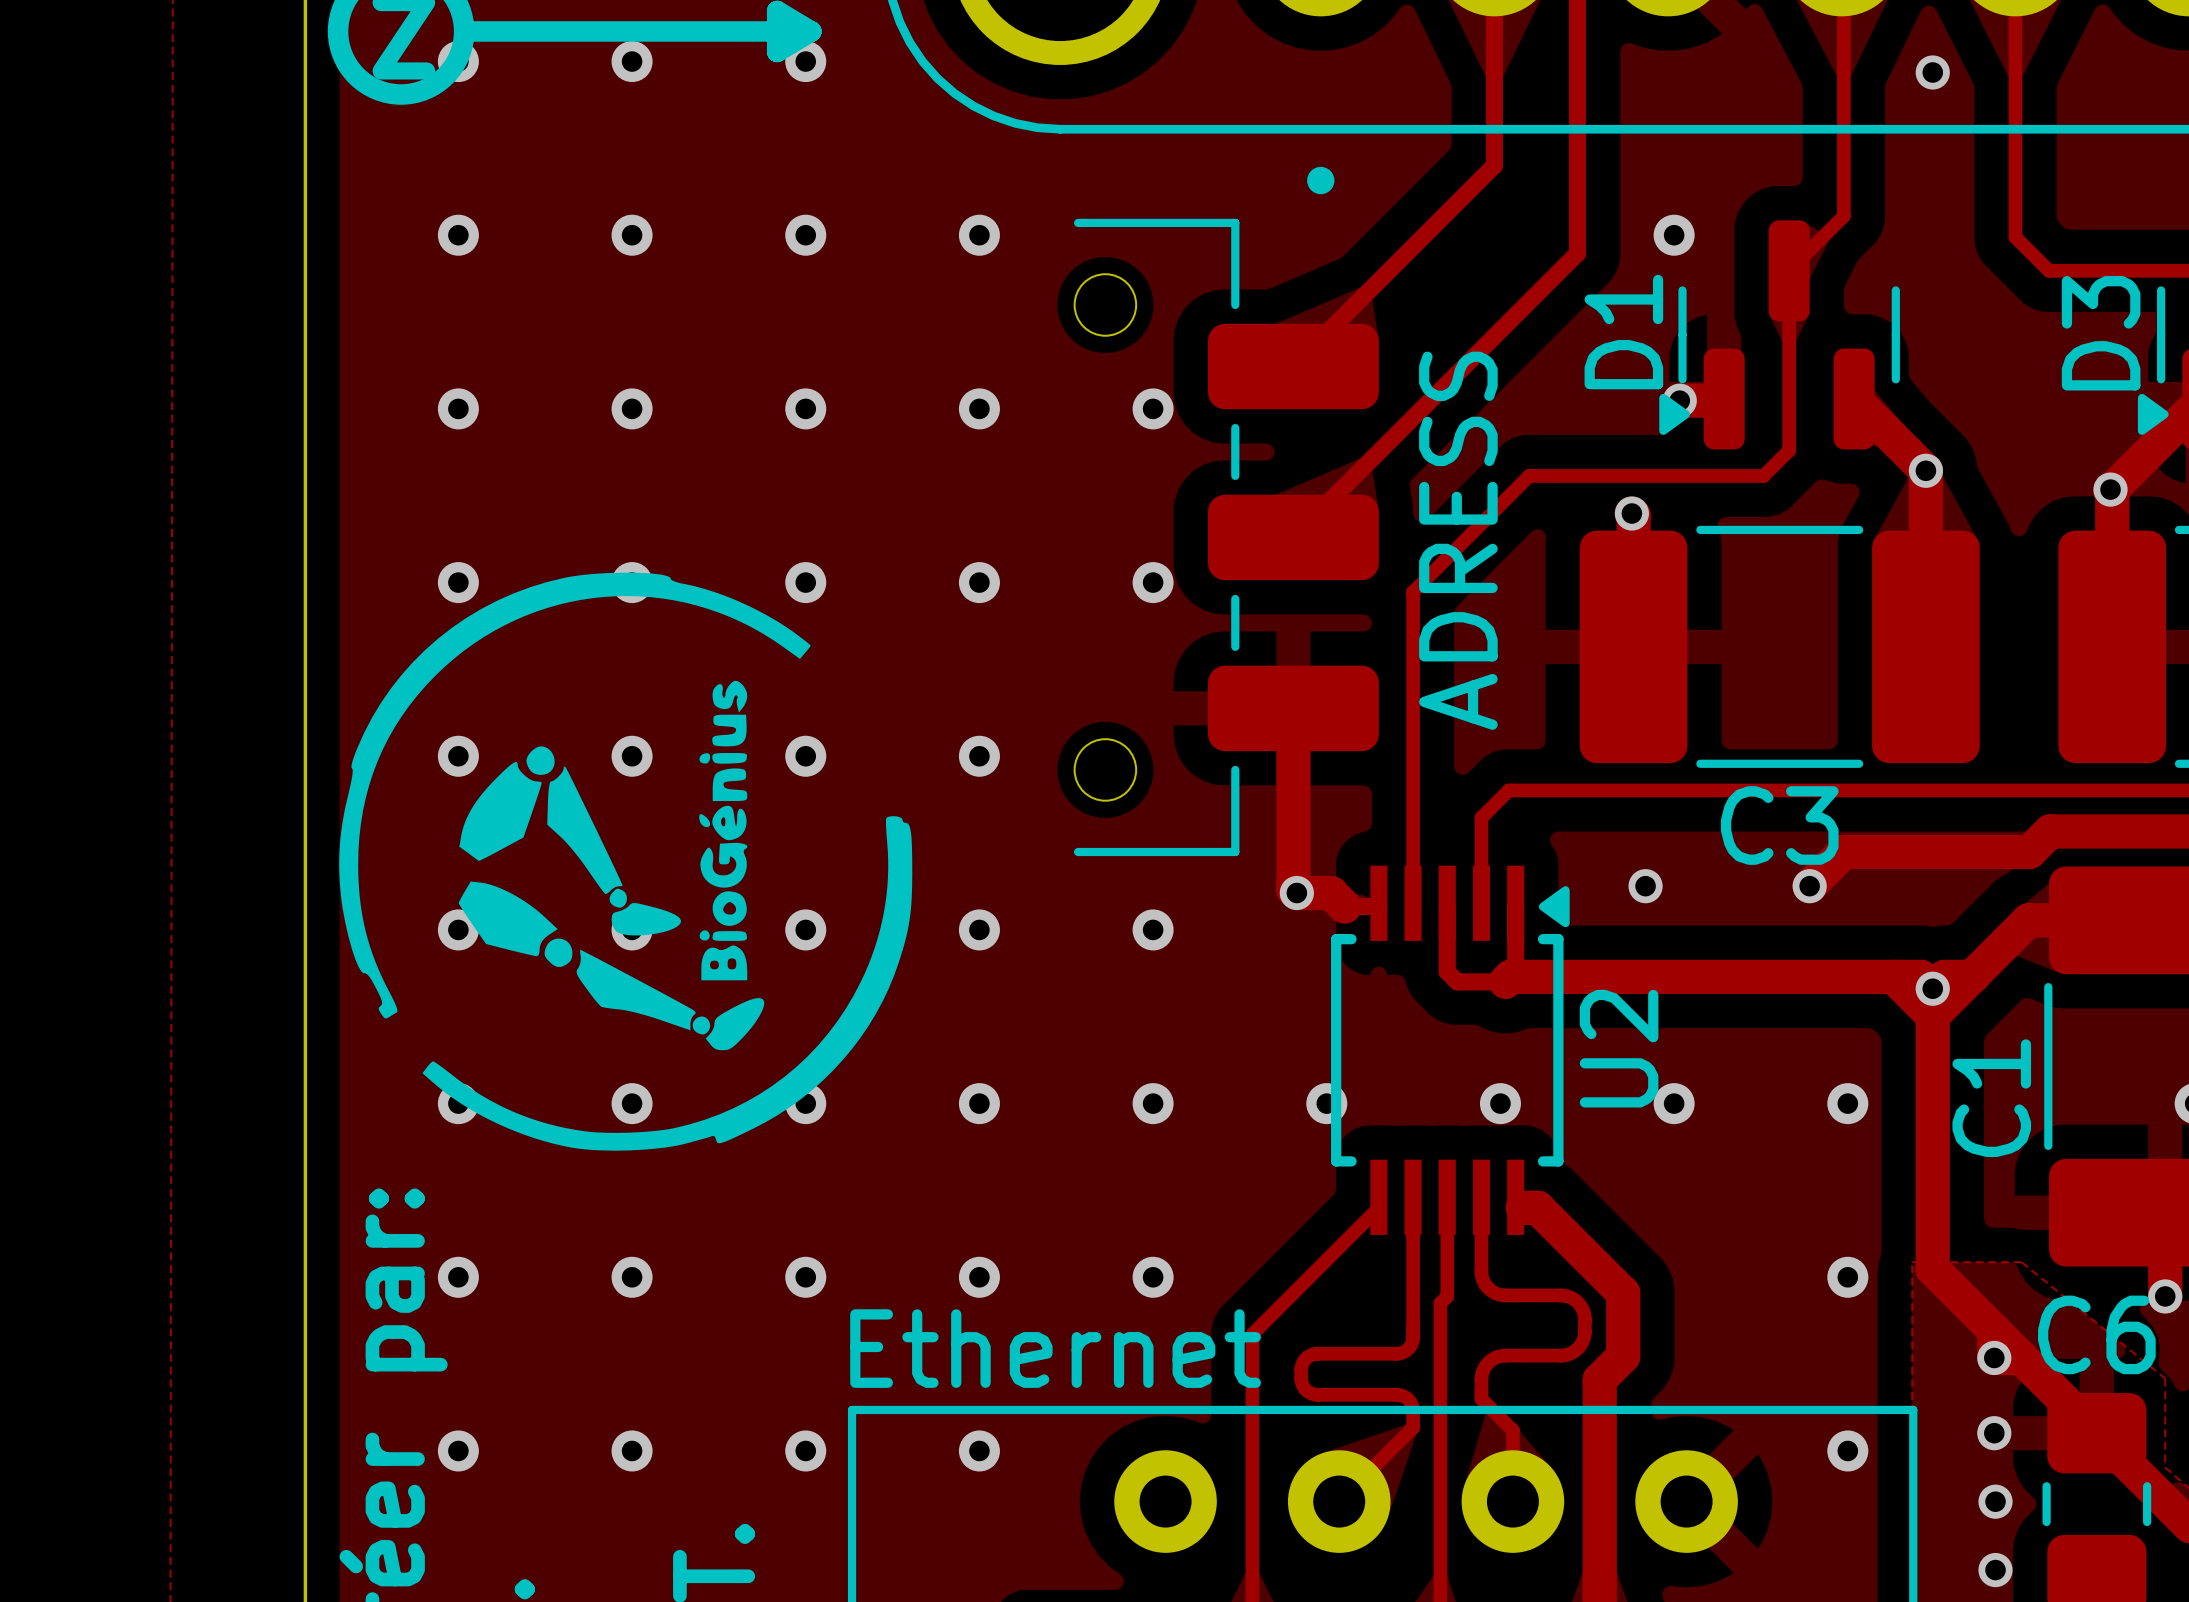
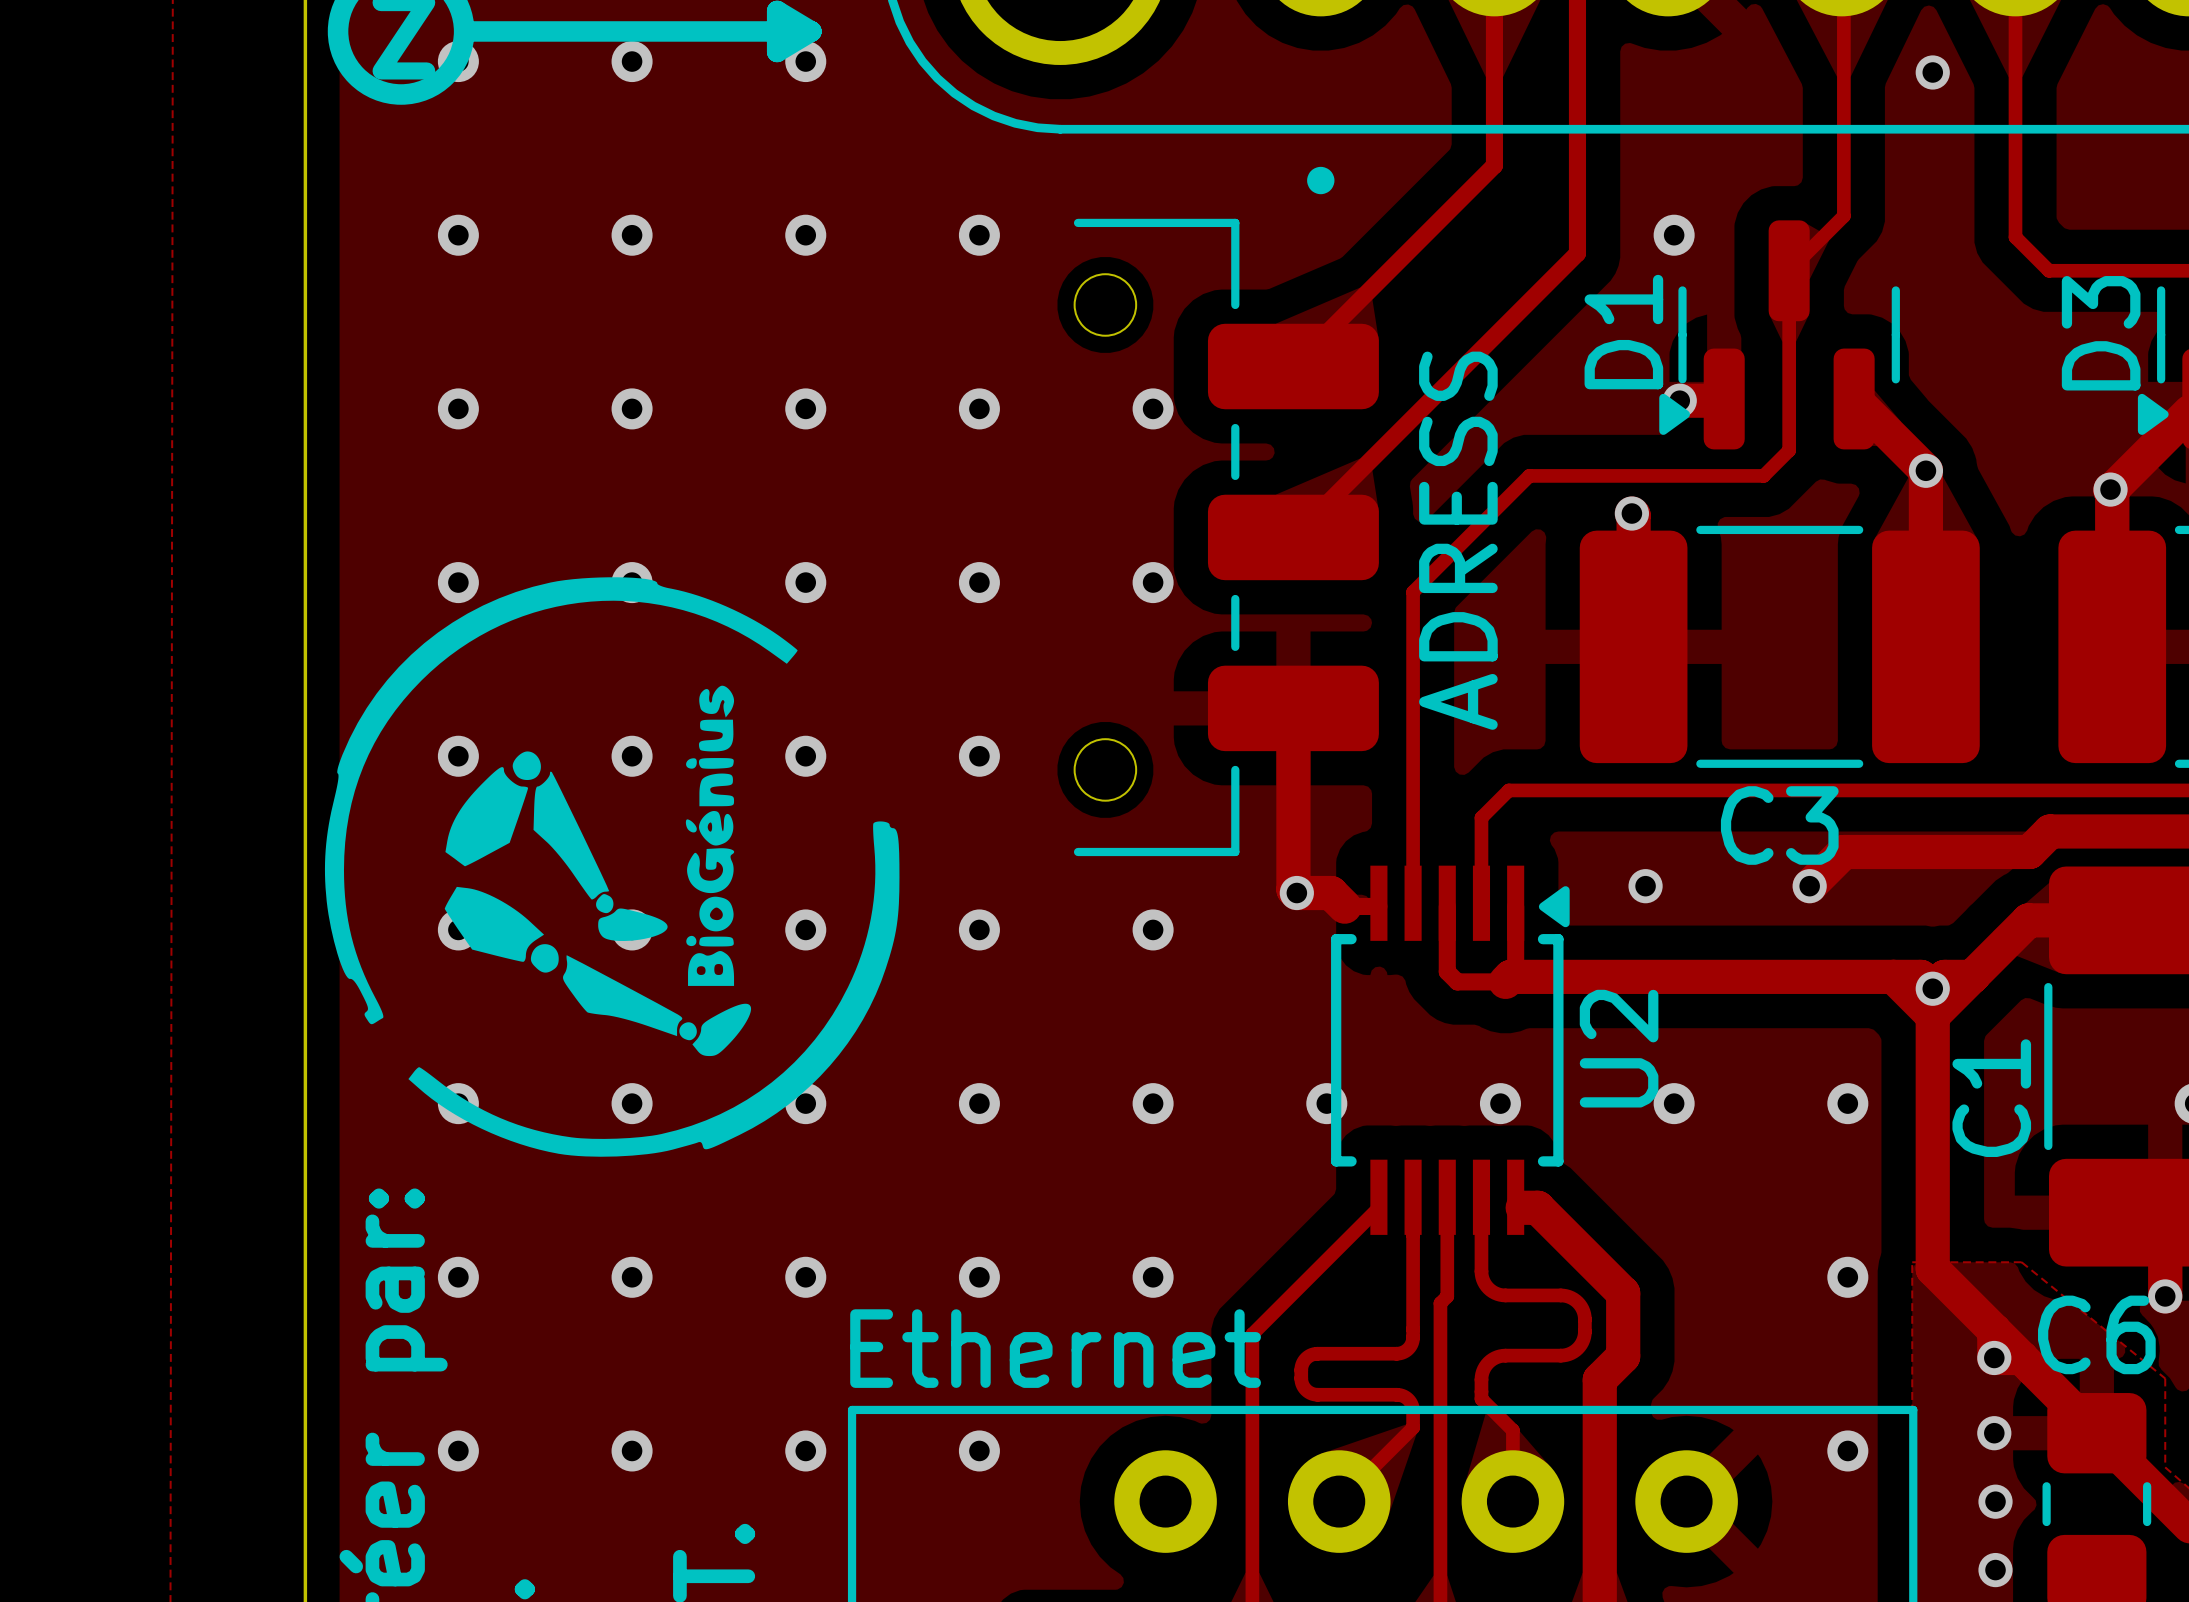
drawing position: (729, 696) -> (716, 701)
drawing position: (729, 730) -> (716, 735)
drawing position: (704, 758) -> (691, 763)
drawing position: (729, 758) -> (716, 763)
drawing position: (540, 760) -> (526, 765)
drawing position: (729, 784) -> (716, 789)
drawing position: (574, 795) -> (561, 800)
drawing position: (500, 811) -> (486, 816)
drawing position: (704, 820) -> (691, 825)
drawing position: (729, 823) -> (716, 828)
drawing position: (584, 830) -> (571, 835)
drawing position: (723, 865) -> (710, 870)
drawing position: (618, 898) -> (604, 903)
drawing position: (729, 908) -> (716, 914)
drawing position: (508, 918) -> (494, 924)
drawing position: (646, 919) -> (632, 924)
drawing position: (704, 935) -> (691, 940)
drawing position: (729, 936) -> (716, 941)
drawing position: (558, 952) -> (544, 958)
drawing position: (724, 962) -> (711, 968)
drawing position: (667, 983) -> (653, 989)
drawing position: (636, 990) -> (622, 995)
drawing position: (734, 1024) -> (721, 1029)
drawing position: (701, 1025) -> (688, 1031)

